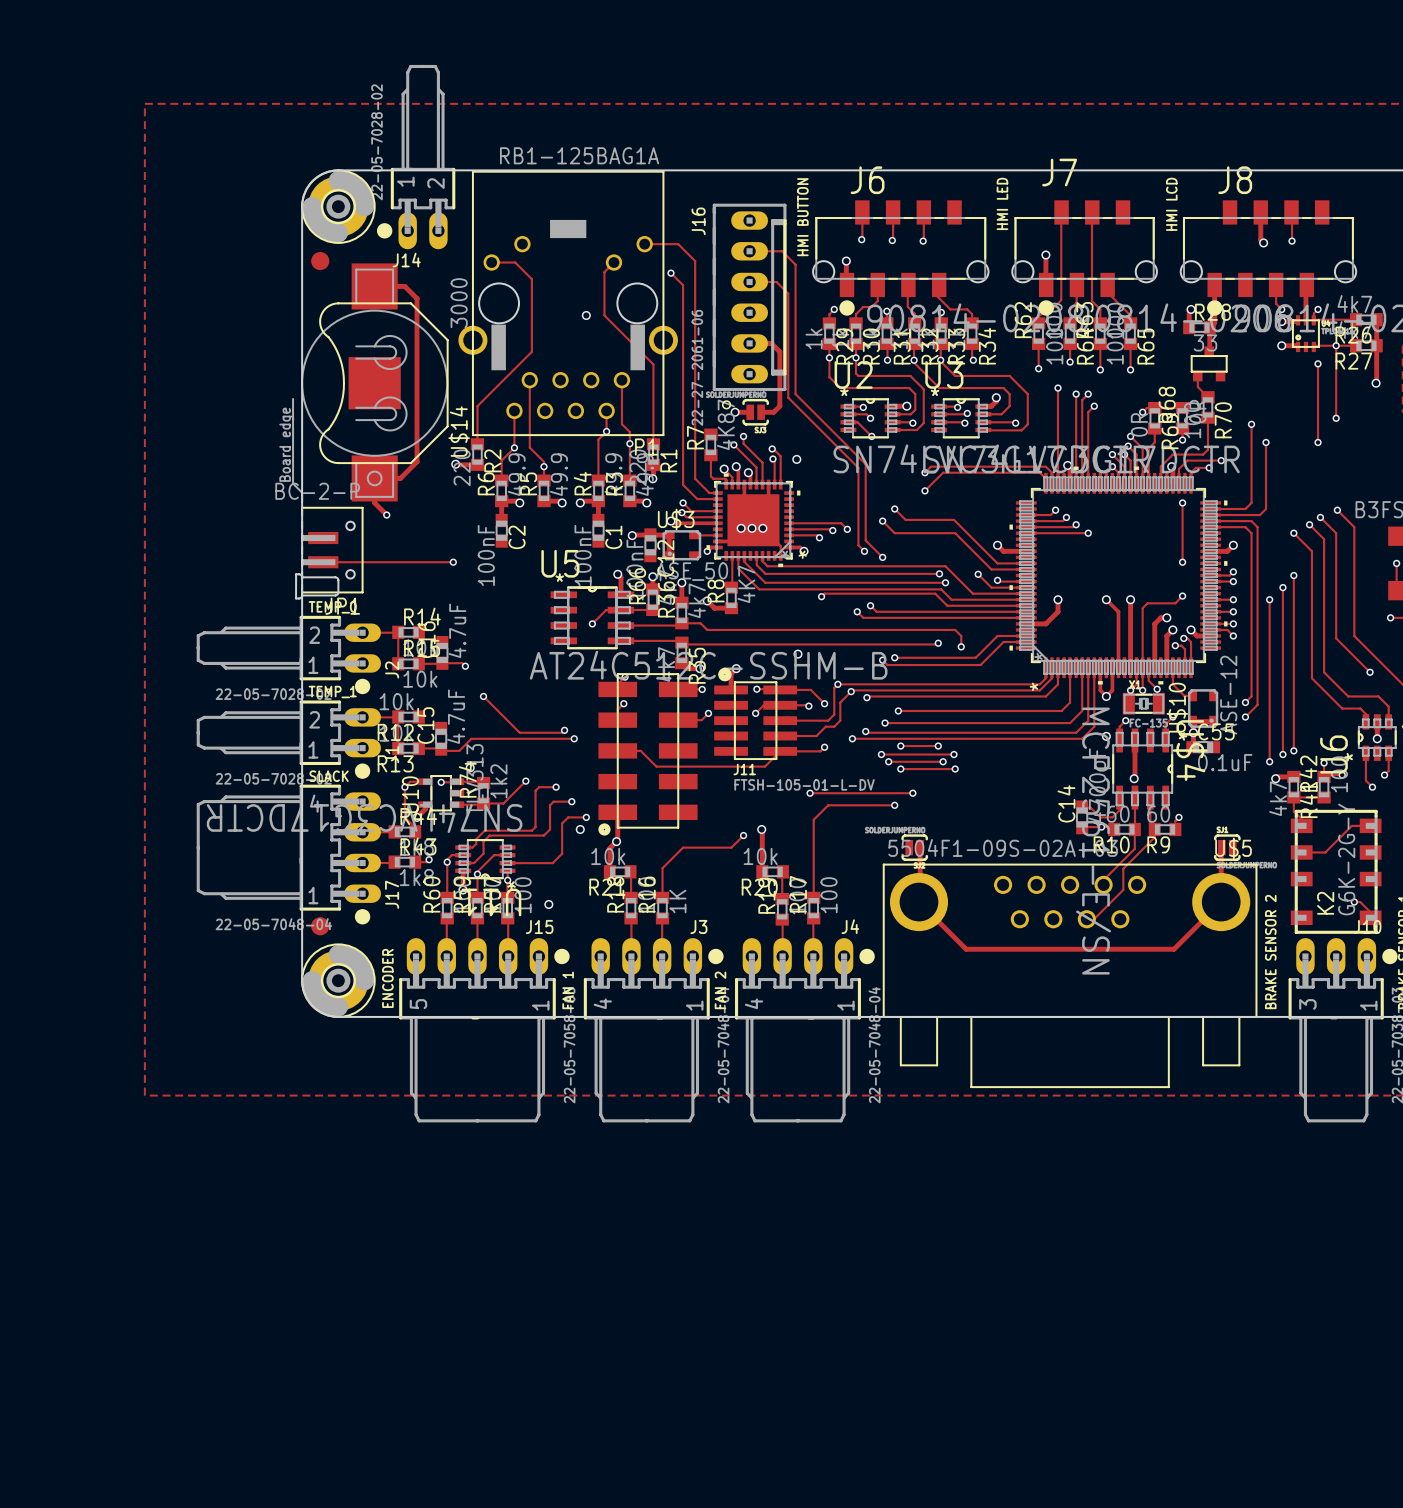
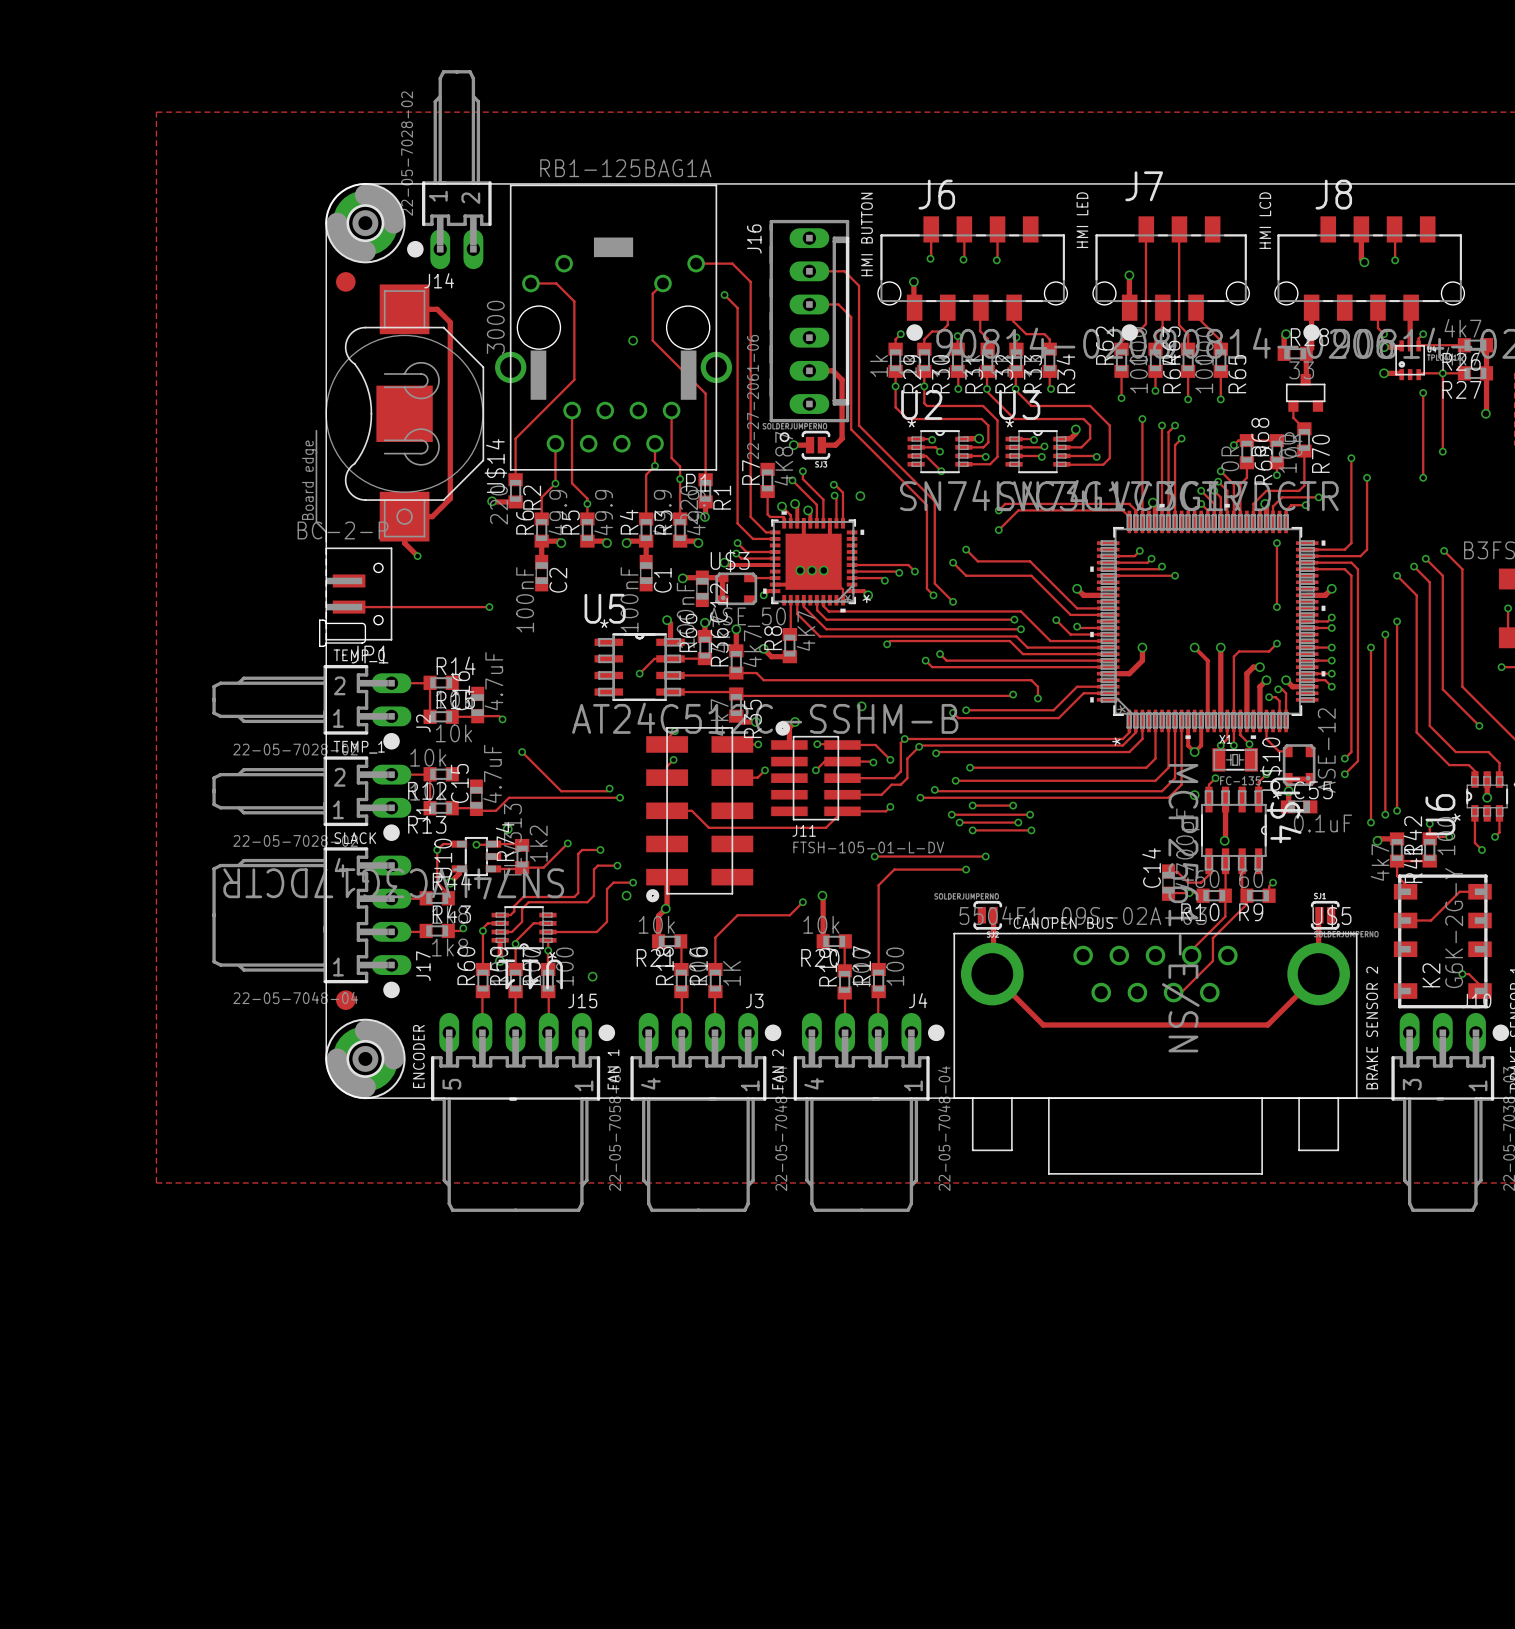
text: none -> CANOPEN BUS (1063, 923)

